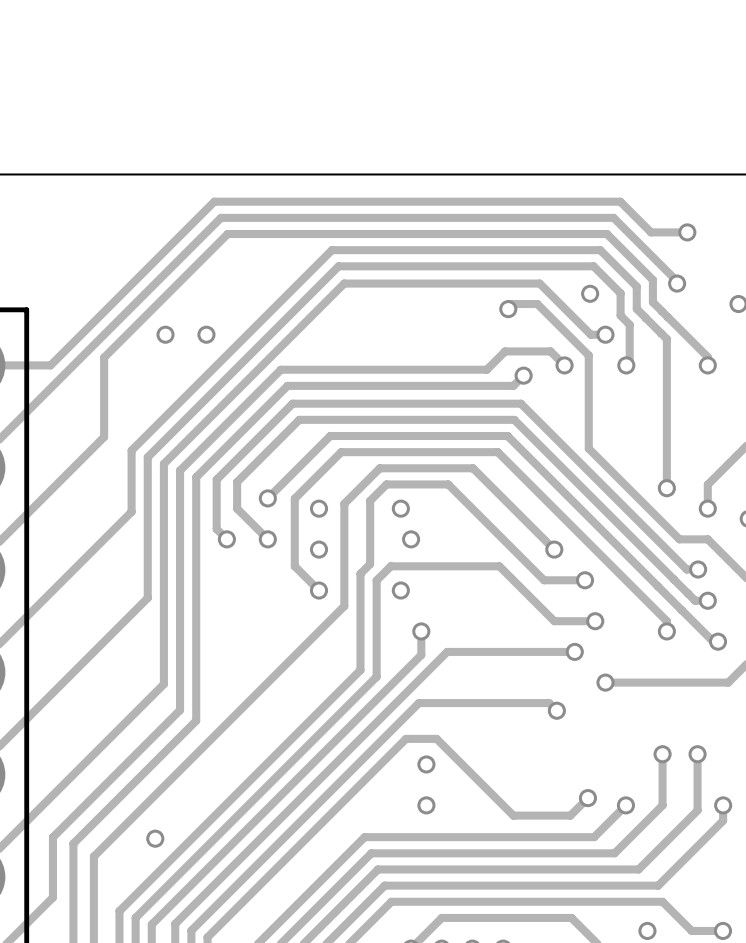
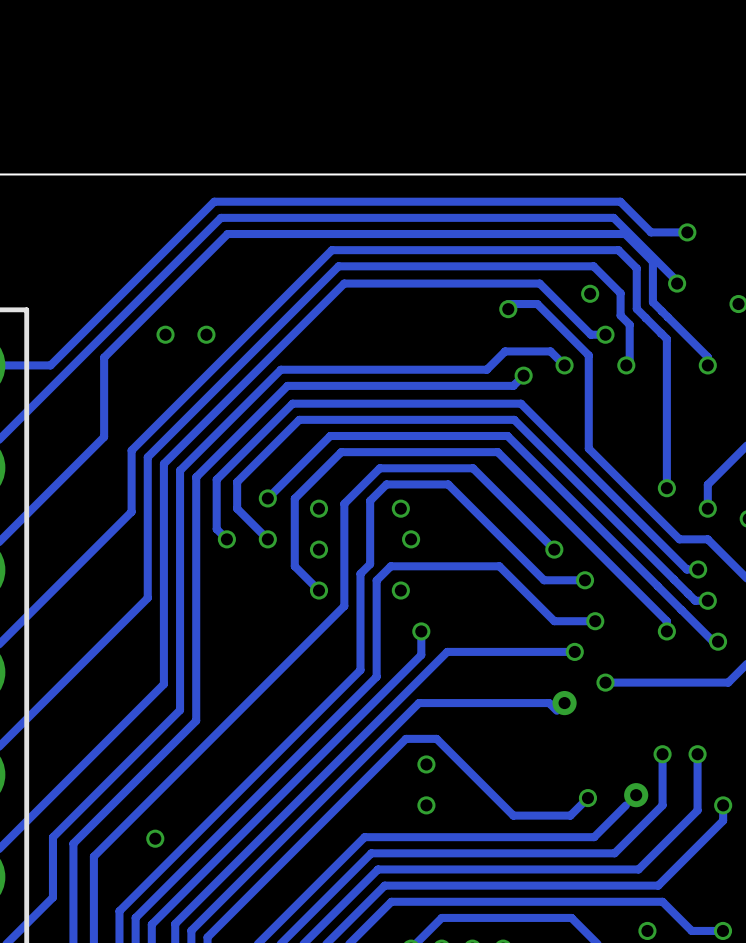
track: (606, 234) (652, 279) -> (606, 234) (625, 234) (652, 261) (652, 279)
track: (600, 250) (636, 286) -> (600, 250) (618, 250) (636, 268) (636, 286)
via size: [547, 701, 566, 720] -> [552, 690, 577, 716]
via position: (625, 805) -> (636, 795)

